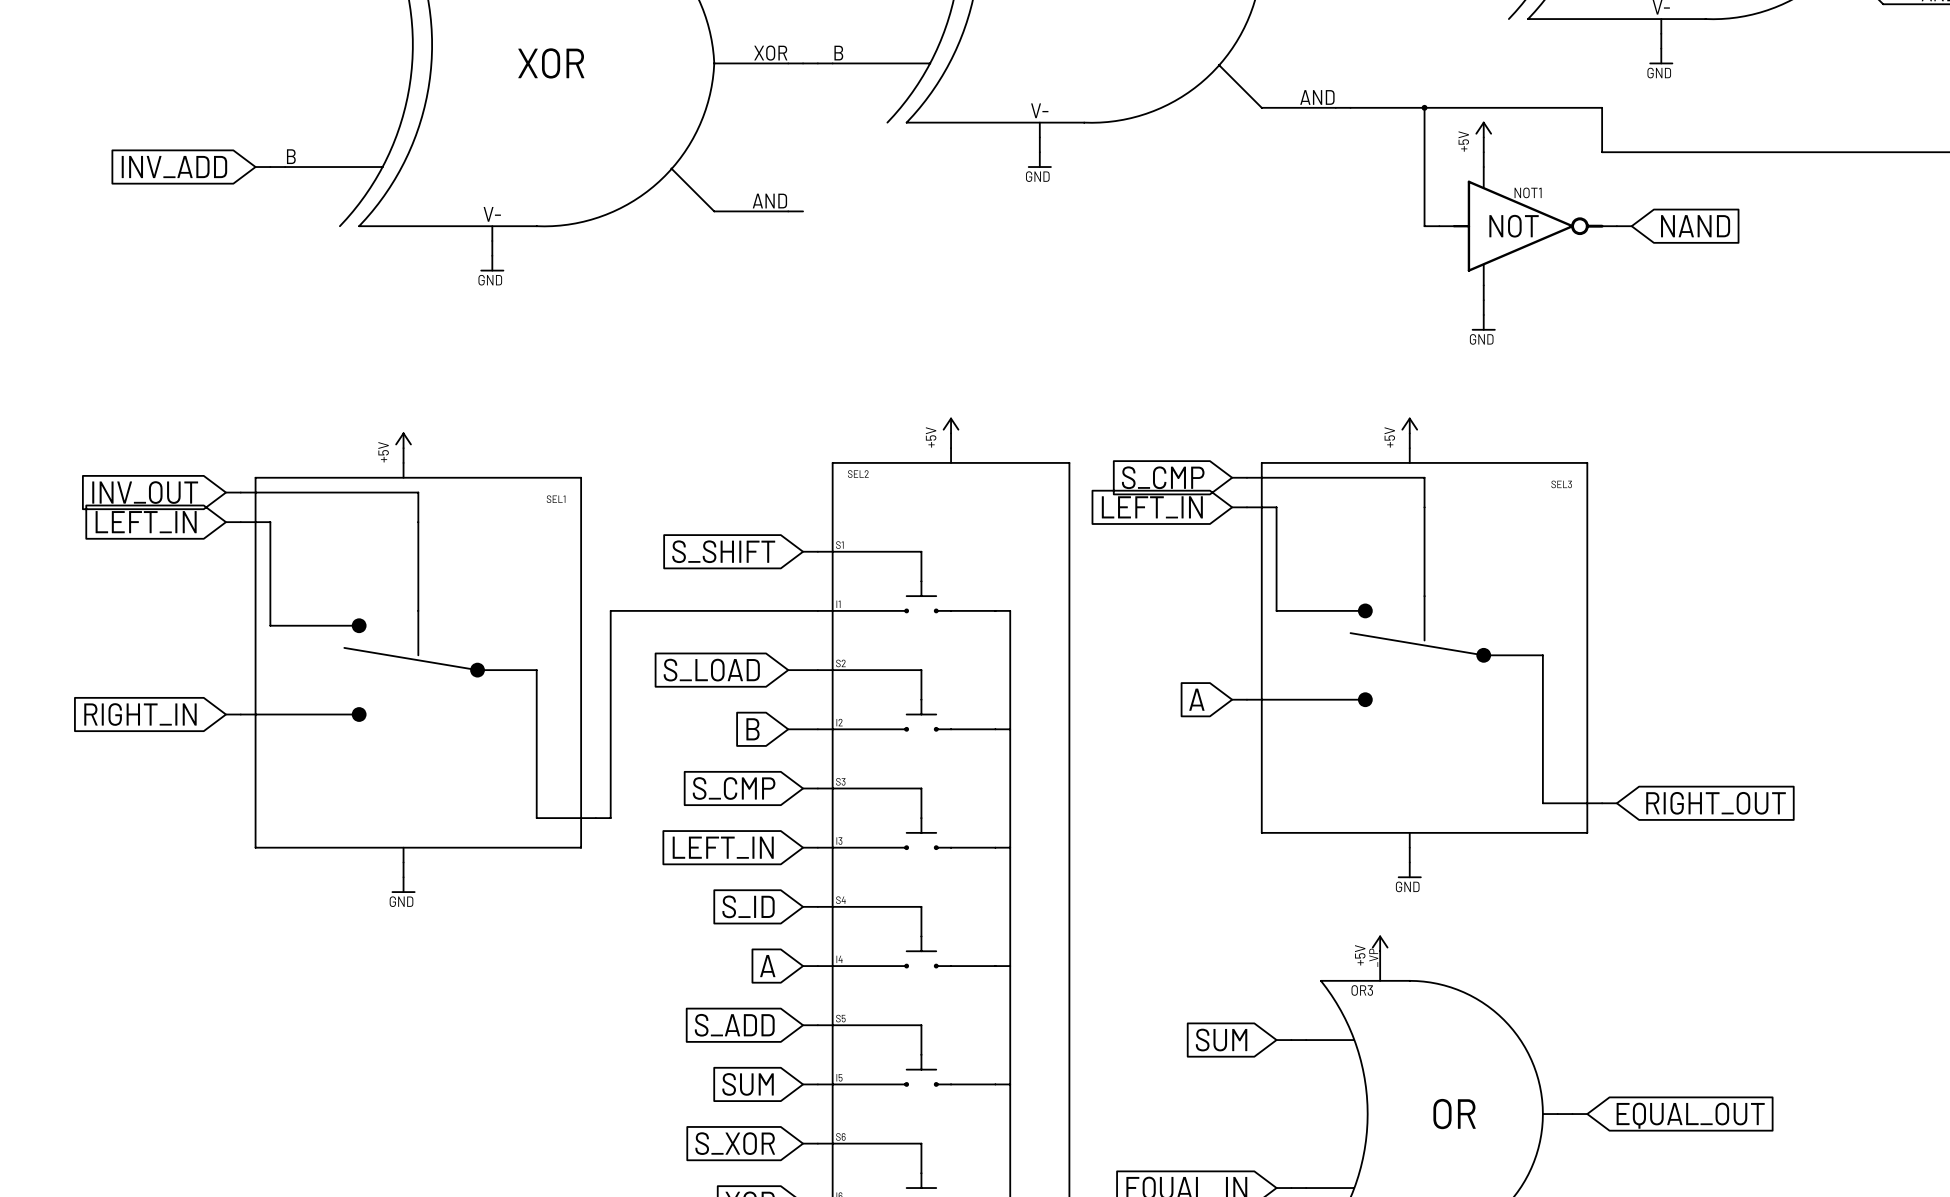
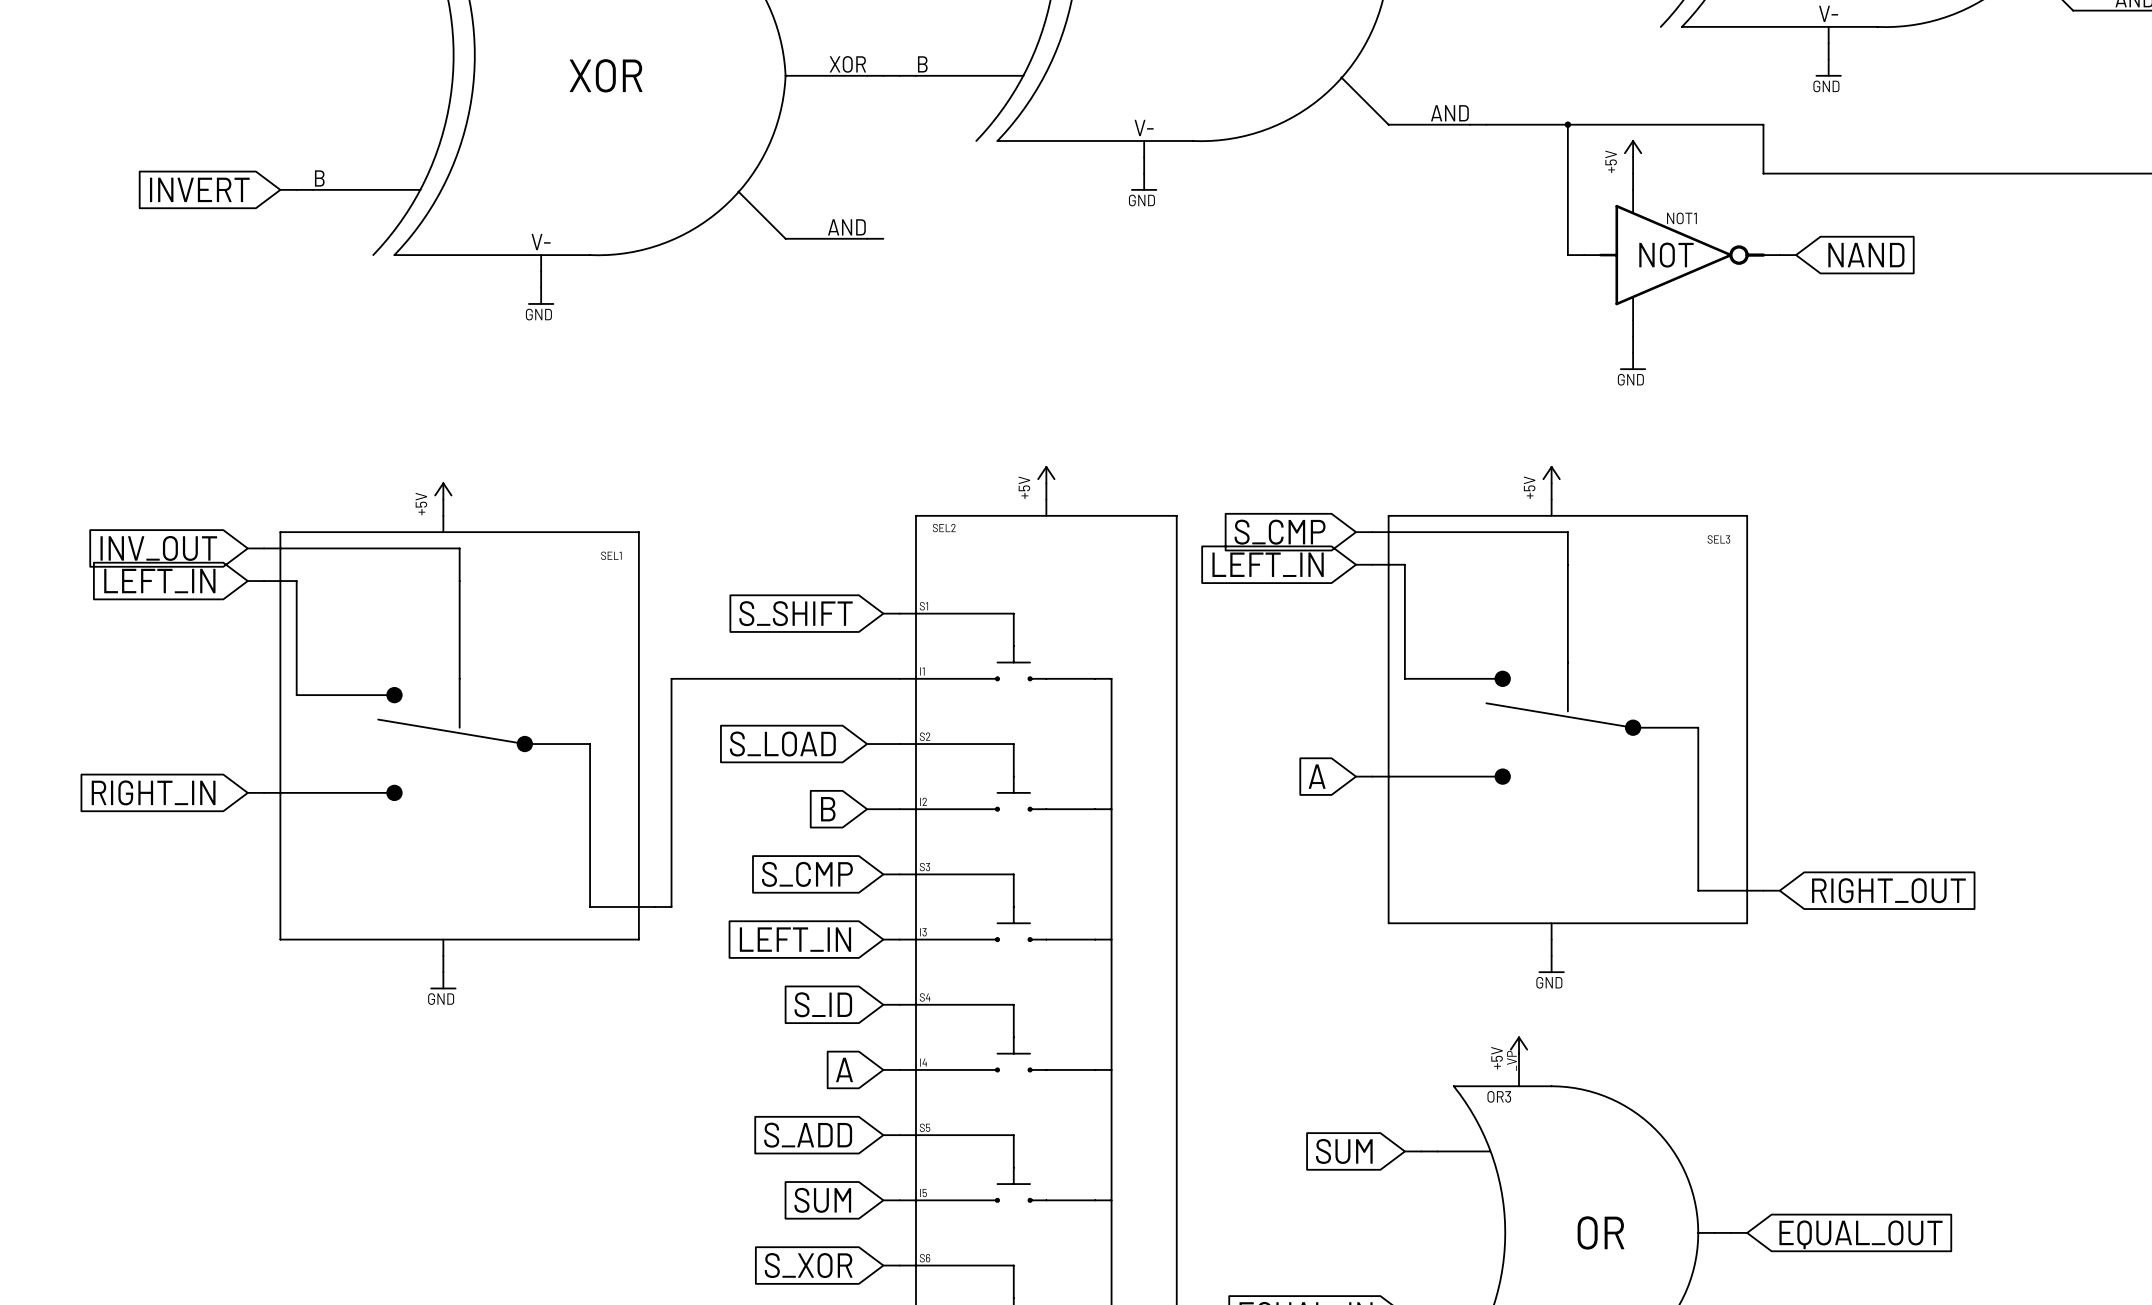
global label: INV_ADD (174, 167) -> INVERT (199, 189)

